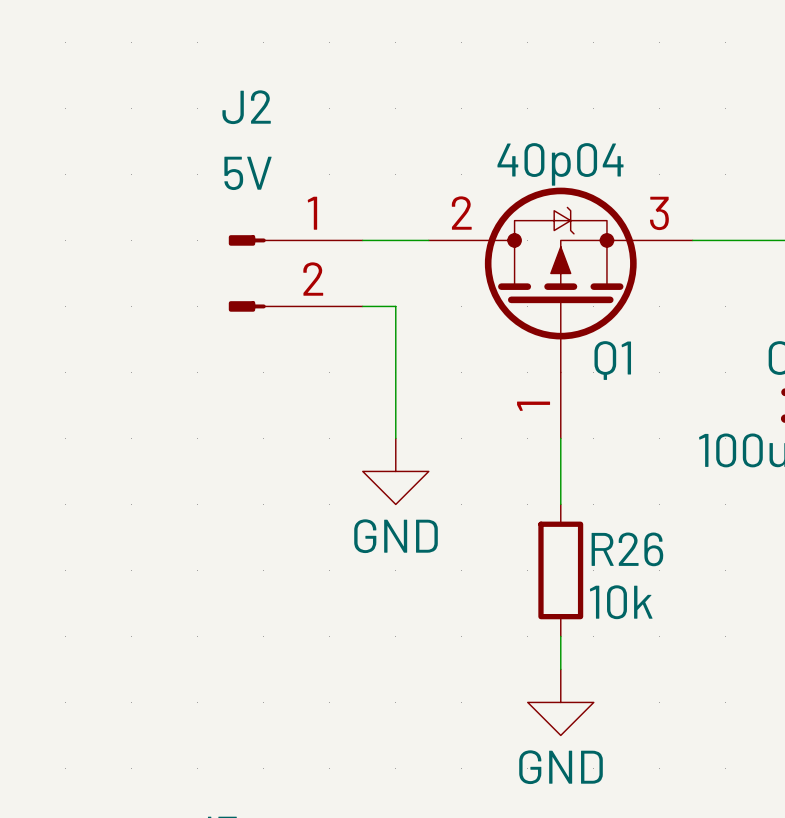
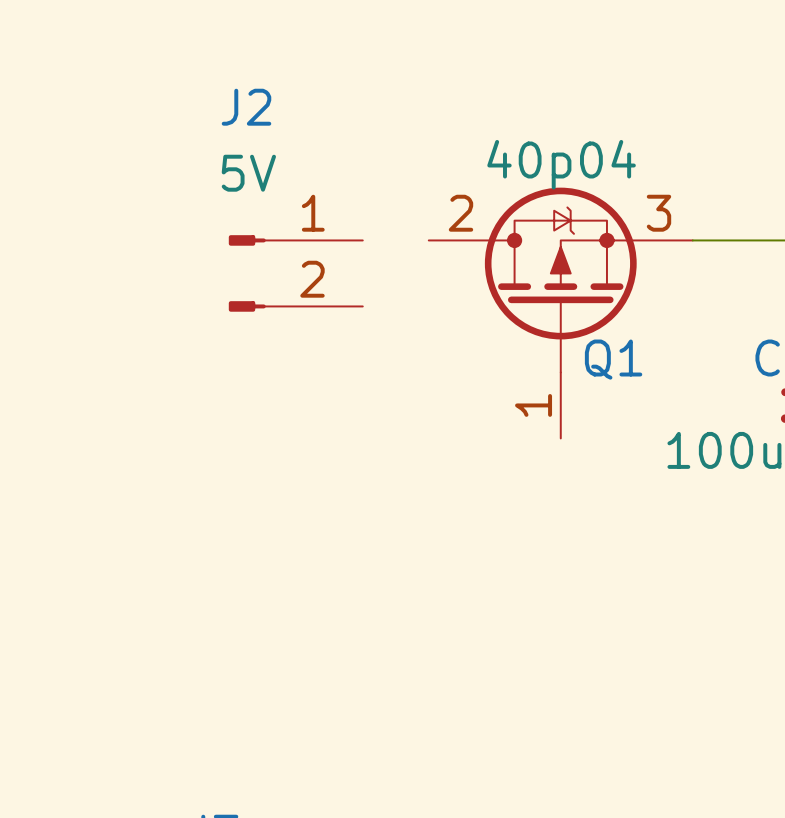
wire: (362, 240) (428, 240) -> none
wire: (362, 306) (395, 306) (395, 438) -> none
wire: (560, 438) (560, 504) -> none
power symbol: GND (395, 471) -> none
R26: 10k (560, 570) -> none
wire: (560, 636) (560, 669) -> none
power symbol: GND (560, 702) -> none

